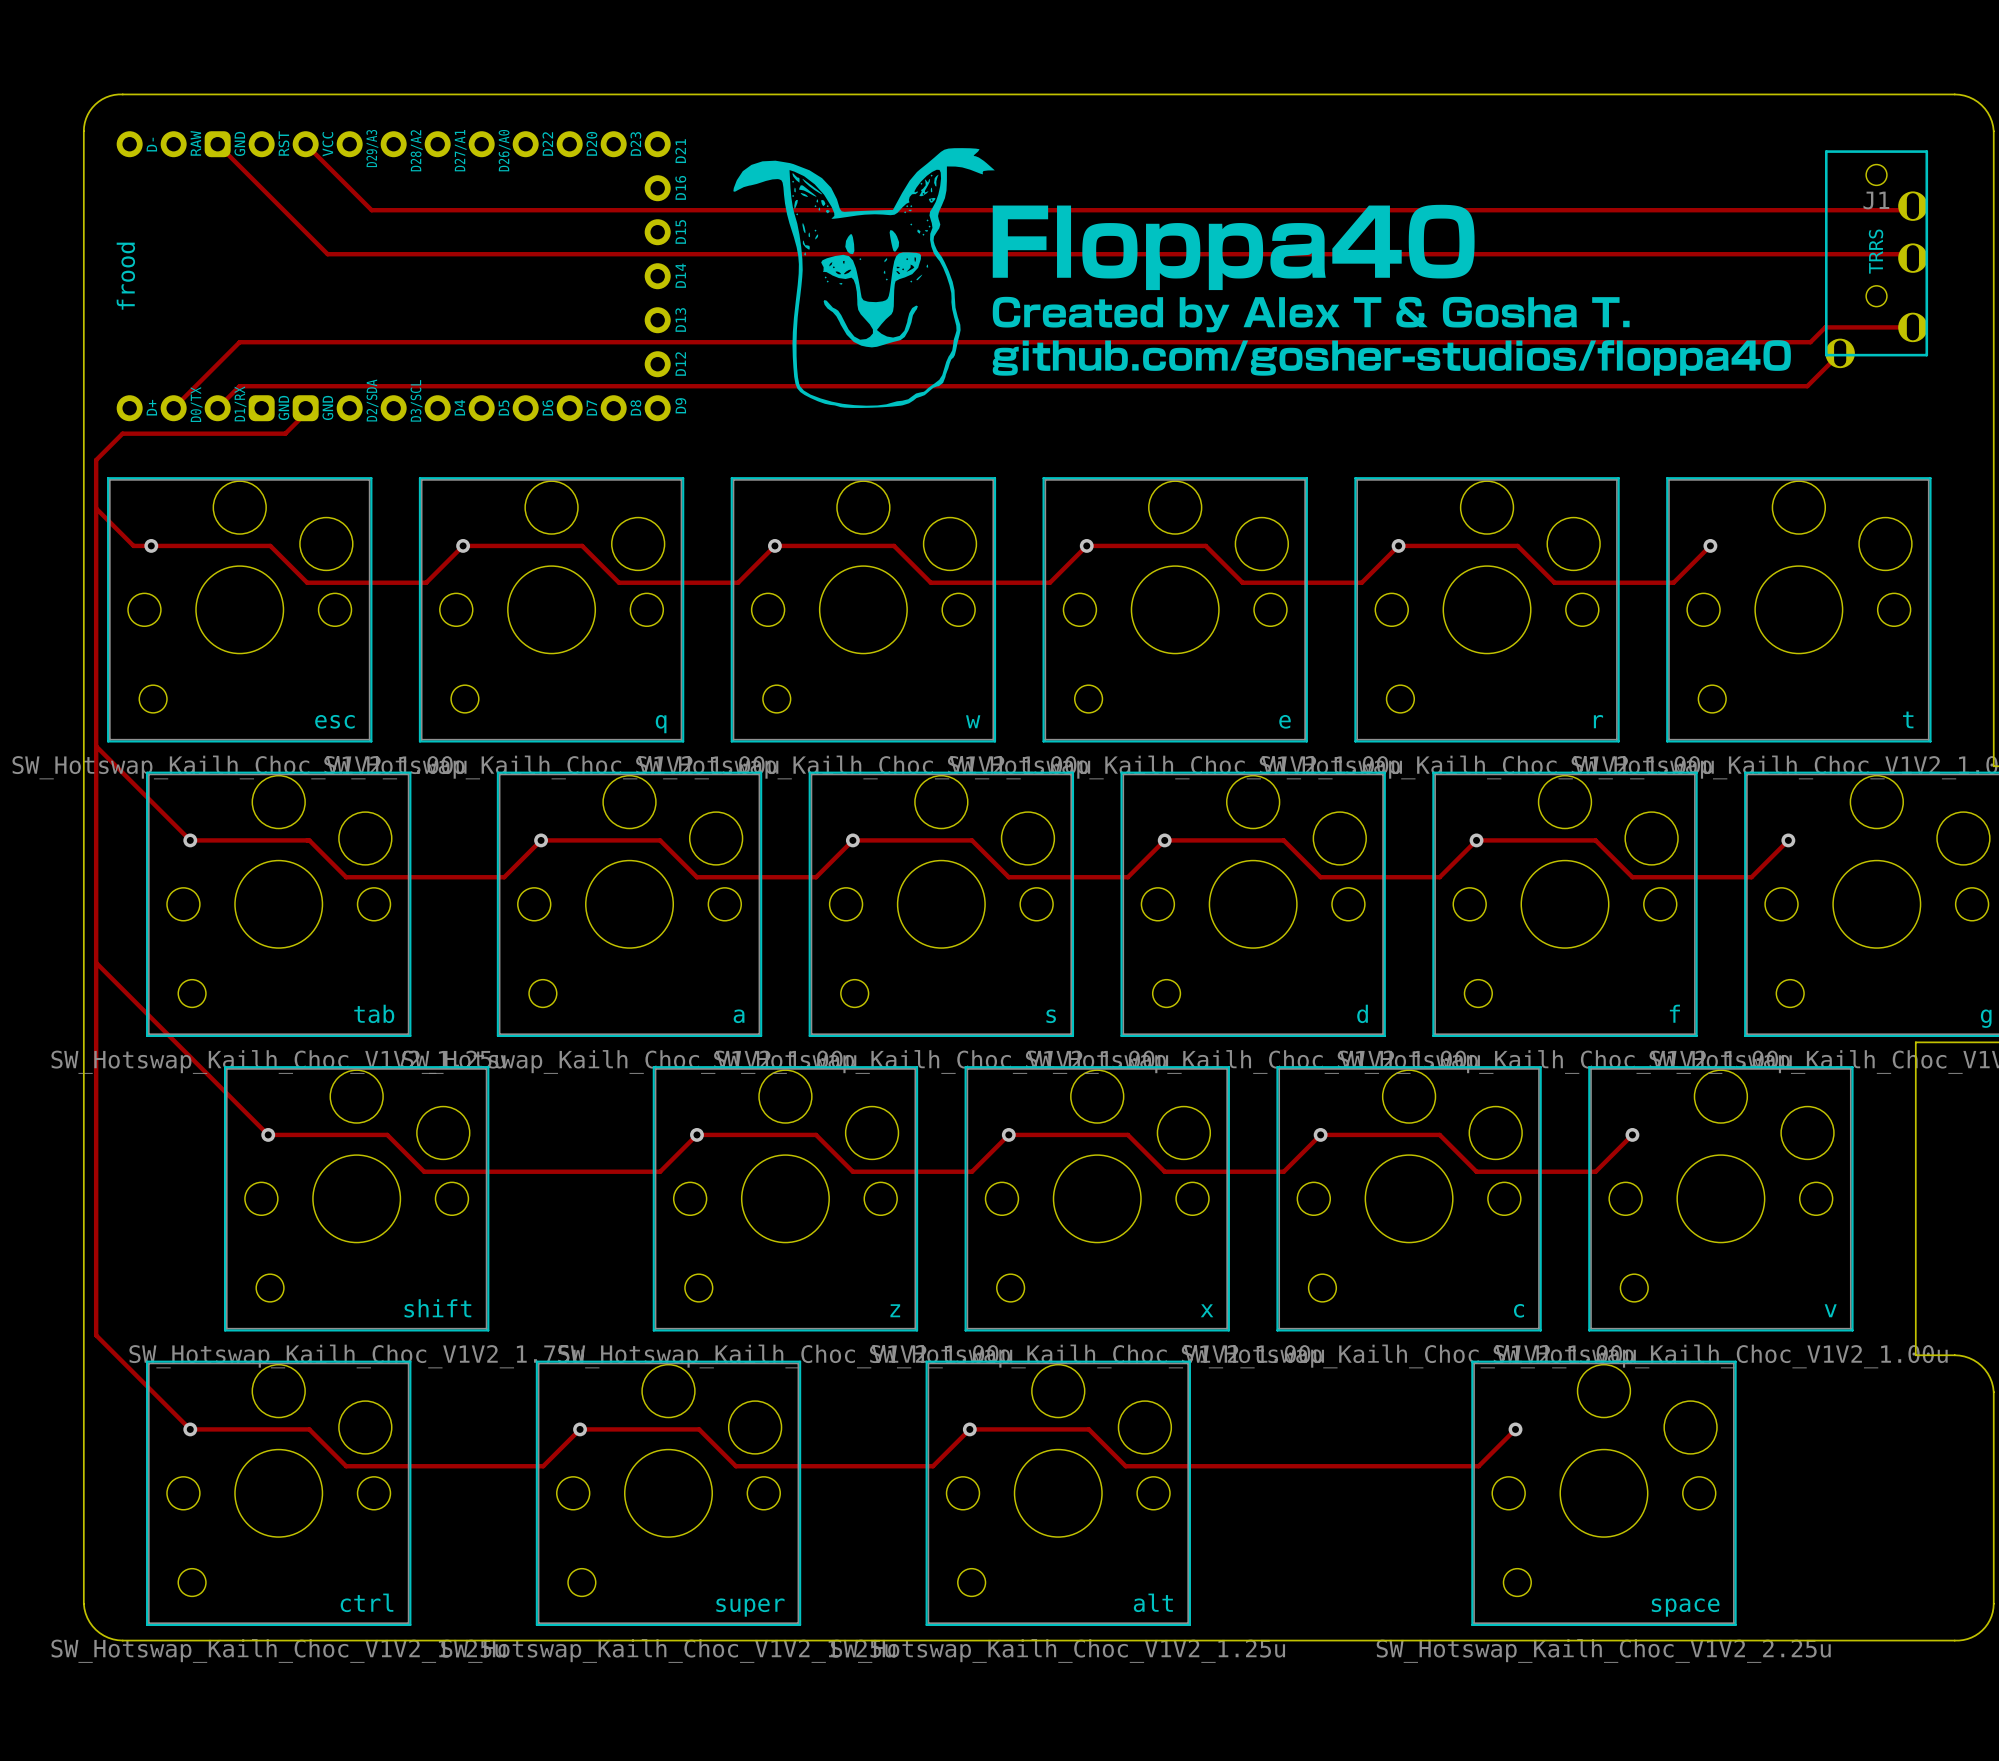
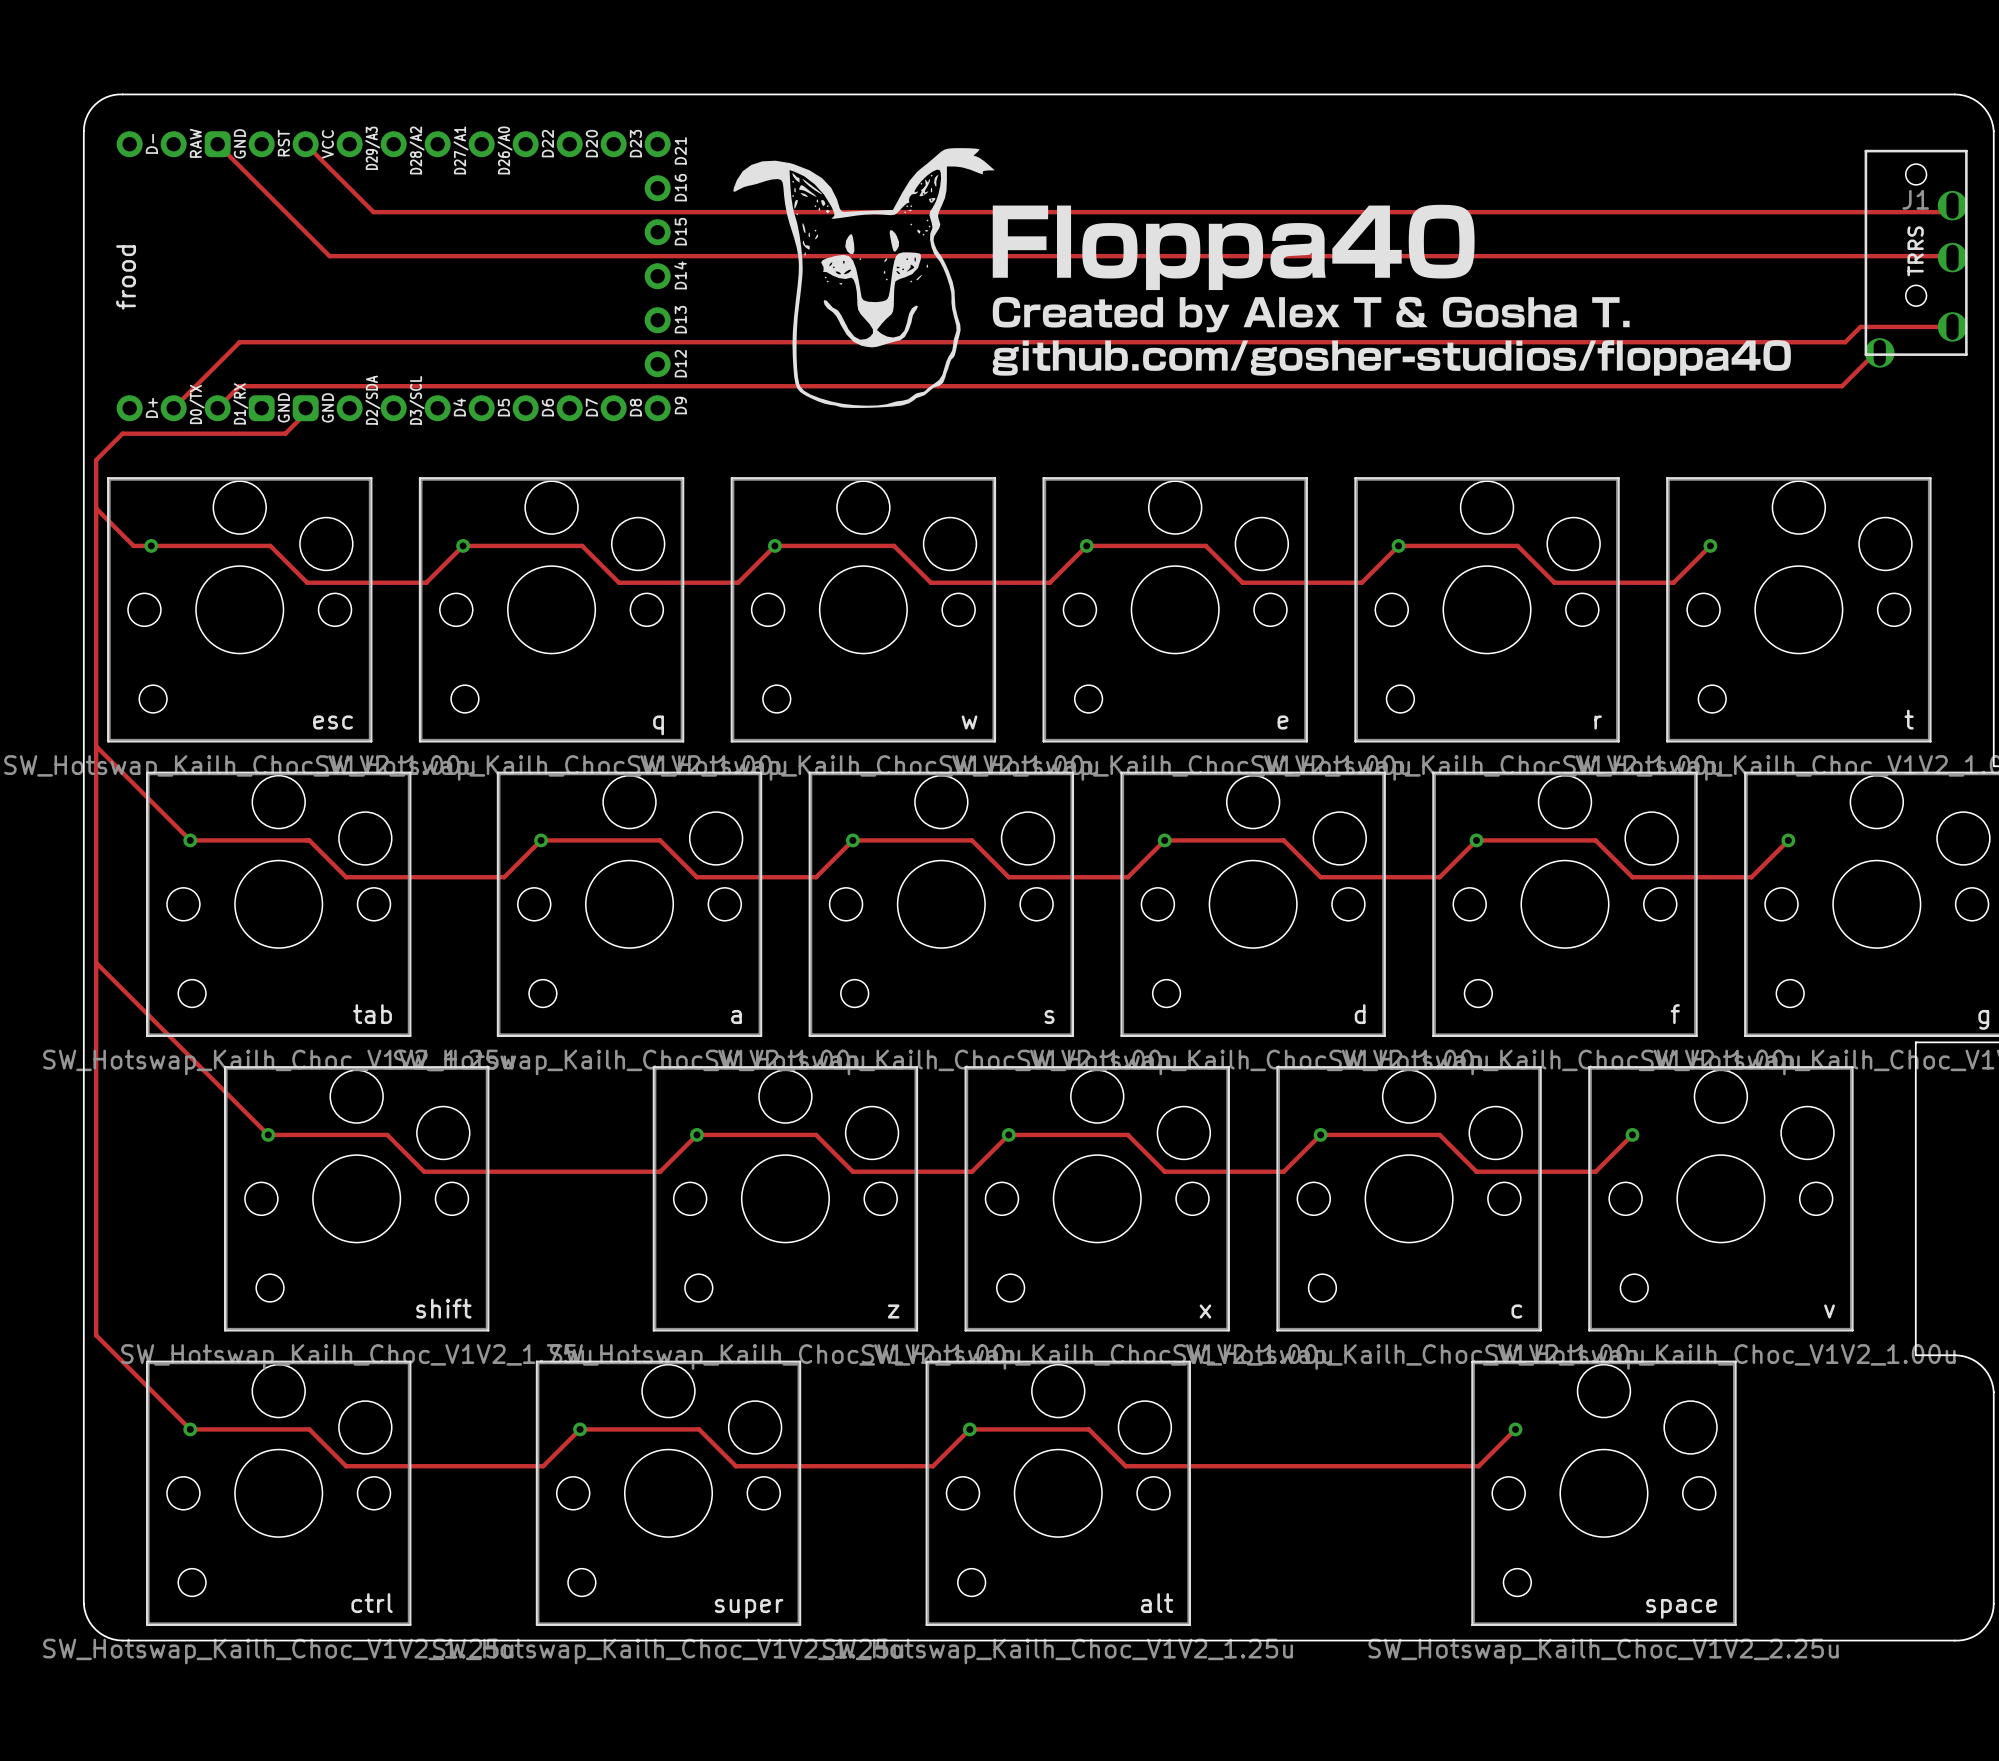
track: (1912, 206) (1908, 210) (371, 210) -> (1952, 205) (1946, 212) (373, 212) (371, 210)
track: (327, 254) (1909, 254) (1912, 258) -> (327, 254) (329, 256) (1952, 257)
J1 position: (1876, 259) -> (1916, 258)
track: (1912, 327) (1825, 327) (1810, 342) -> (1948, 326) (1860, 326) (1845, 342) (1810, 342)
track: (1840, 353) (1807, 386) -> (1875, 352) (1842, 386) (1807, 386)

